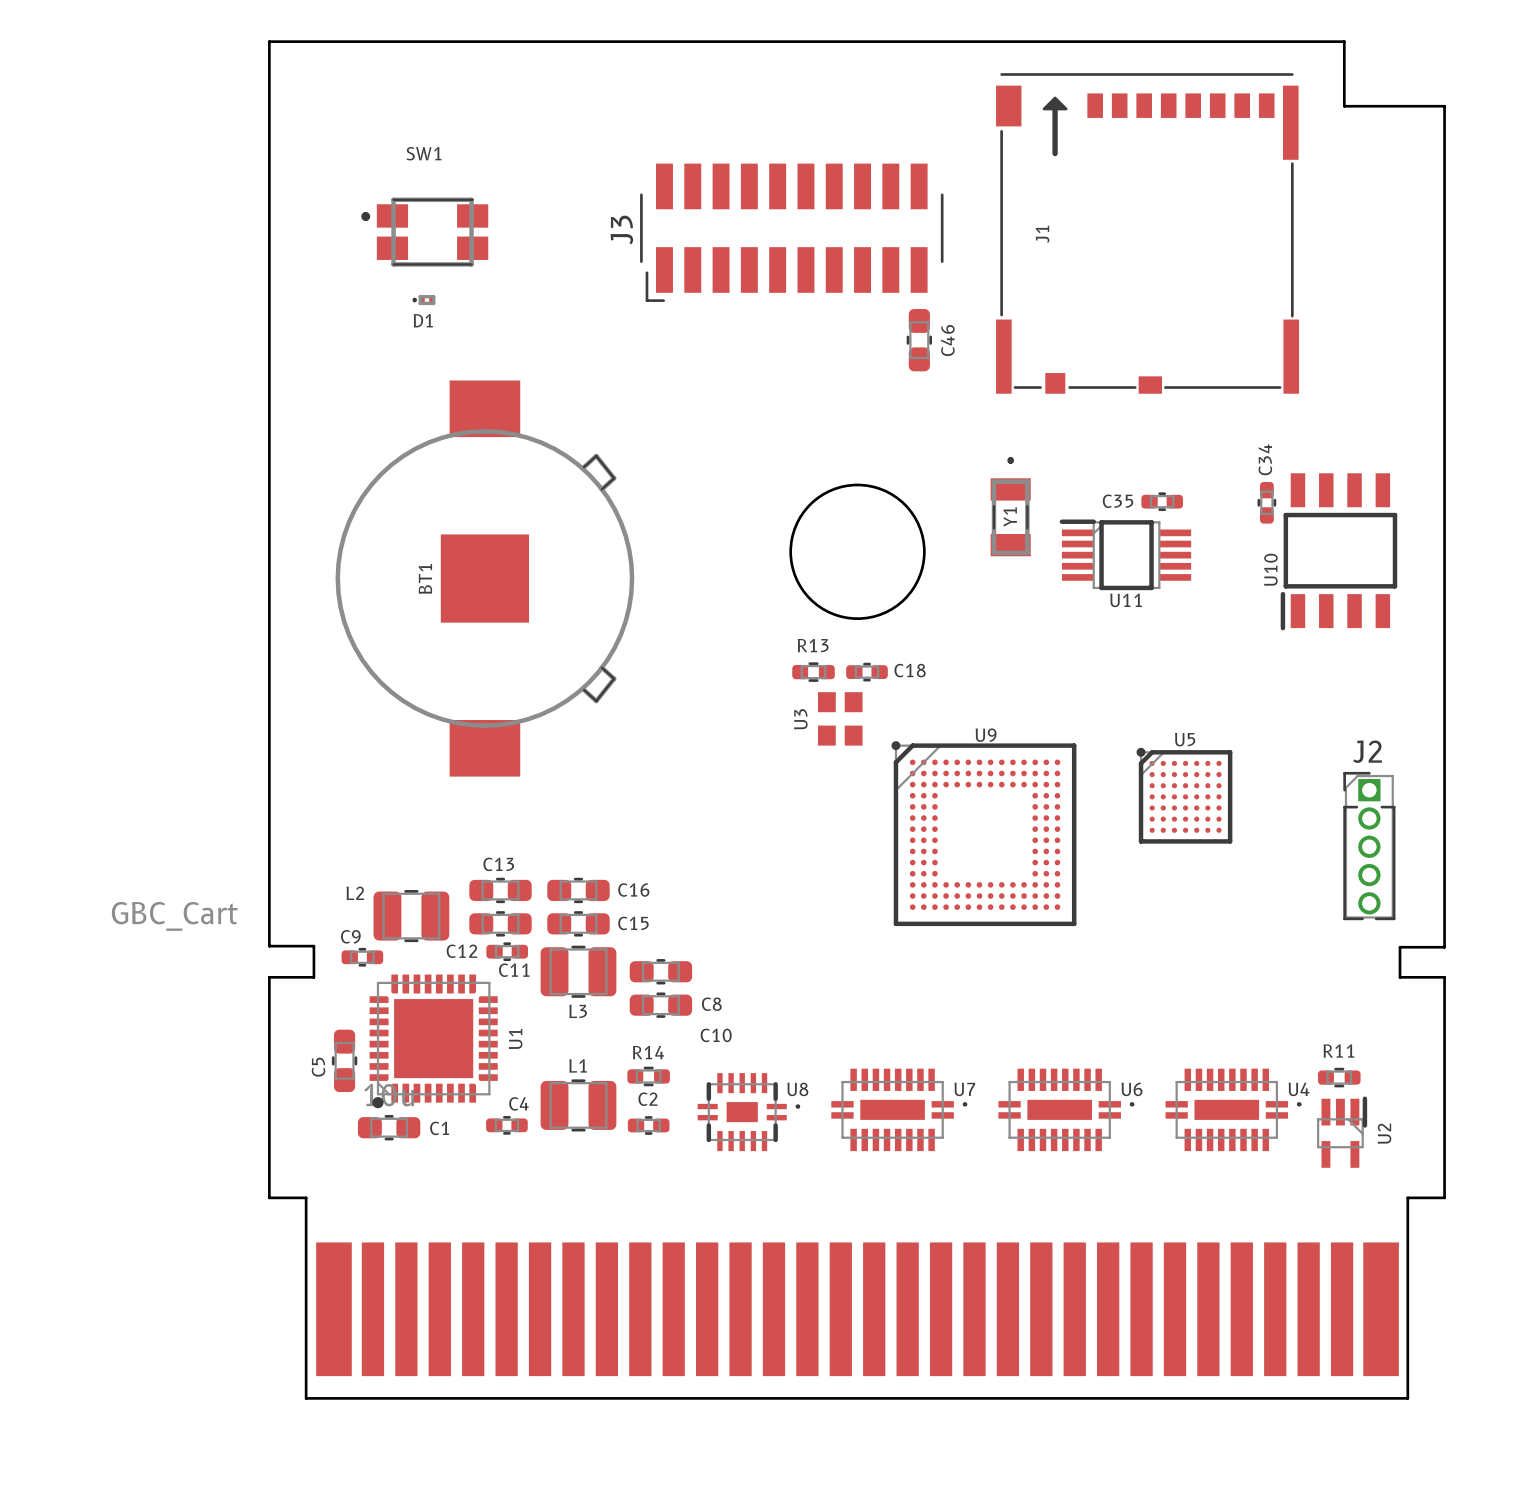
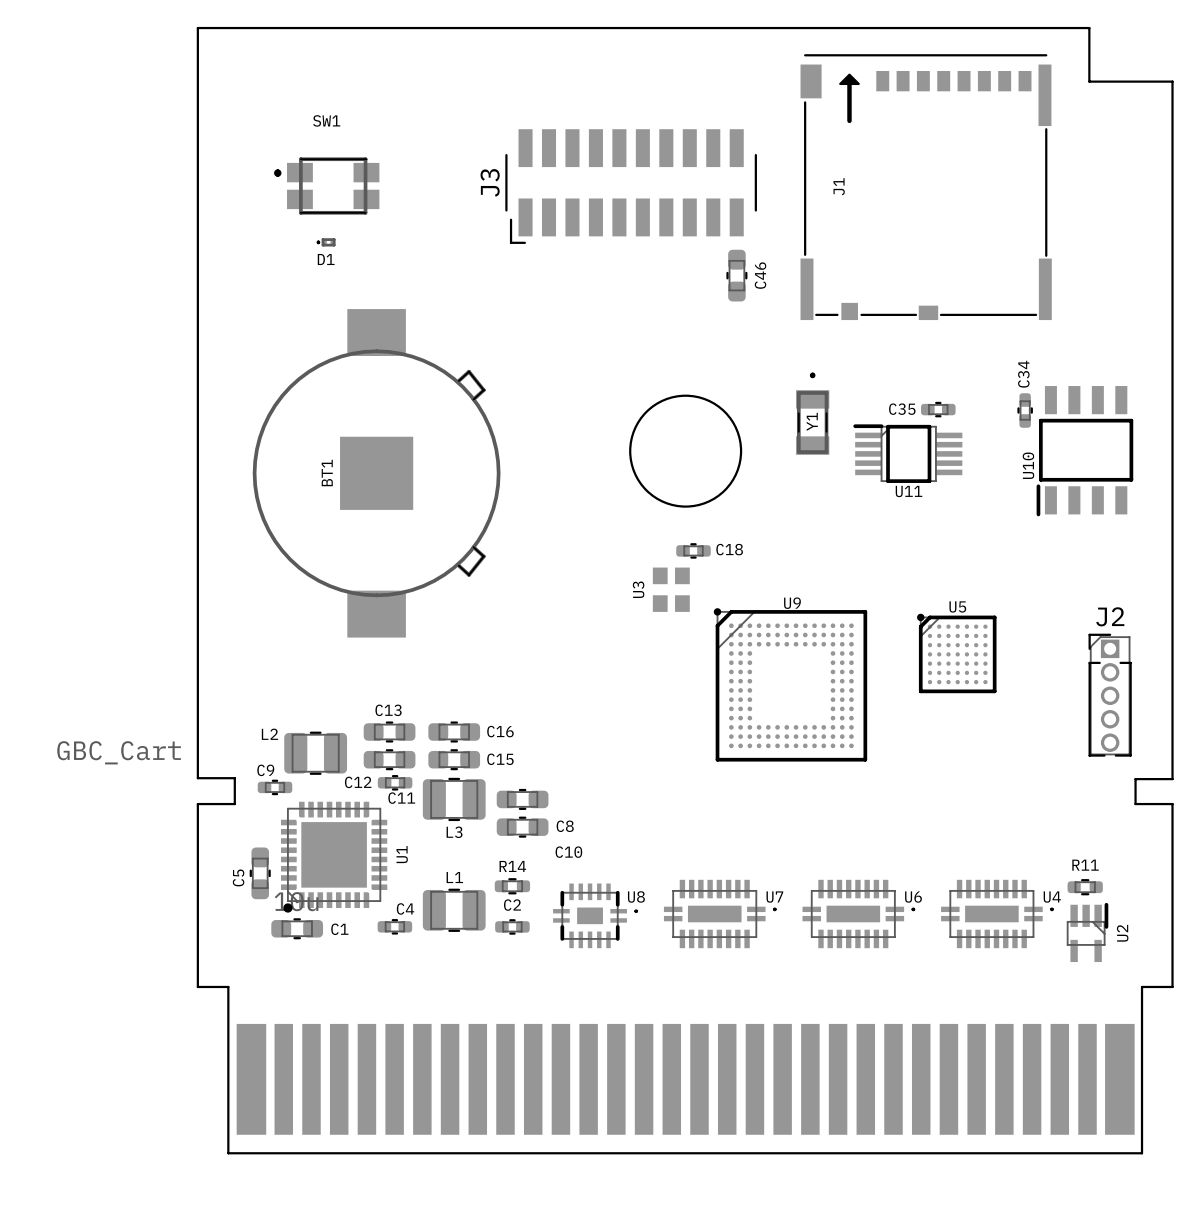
R13: (813, 672) -> none

